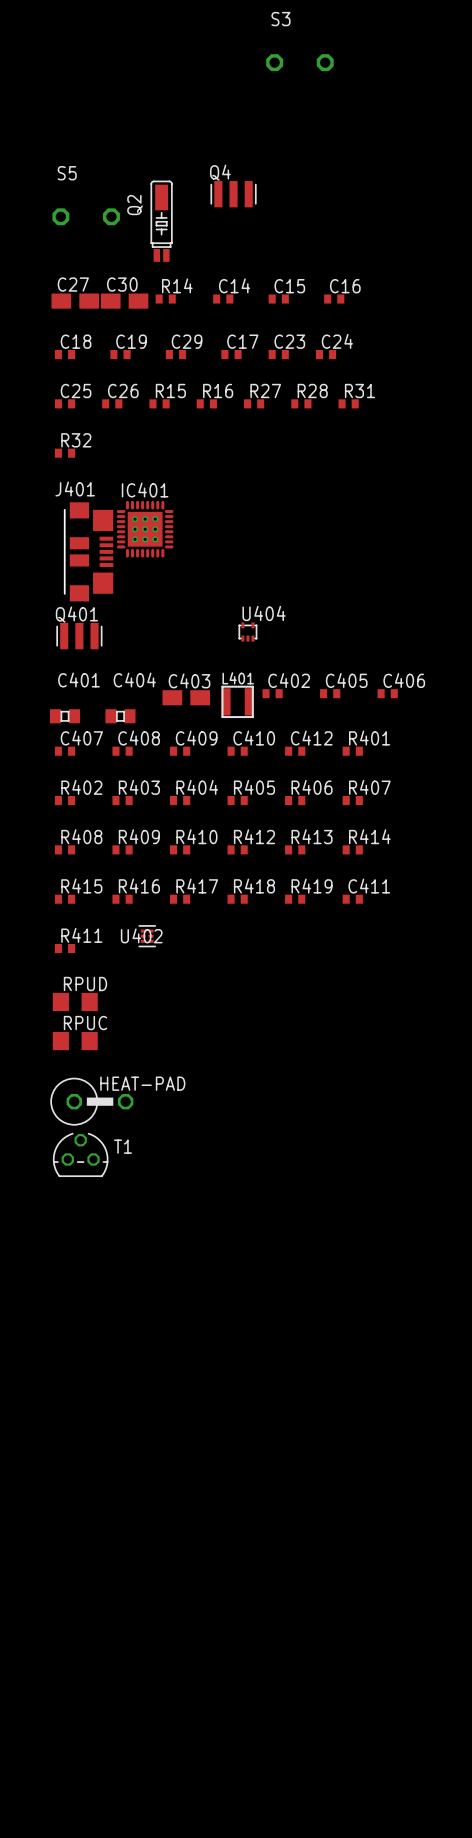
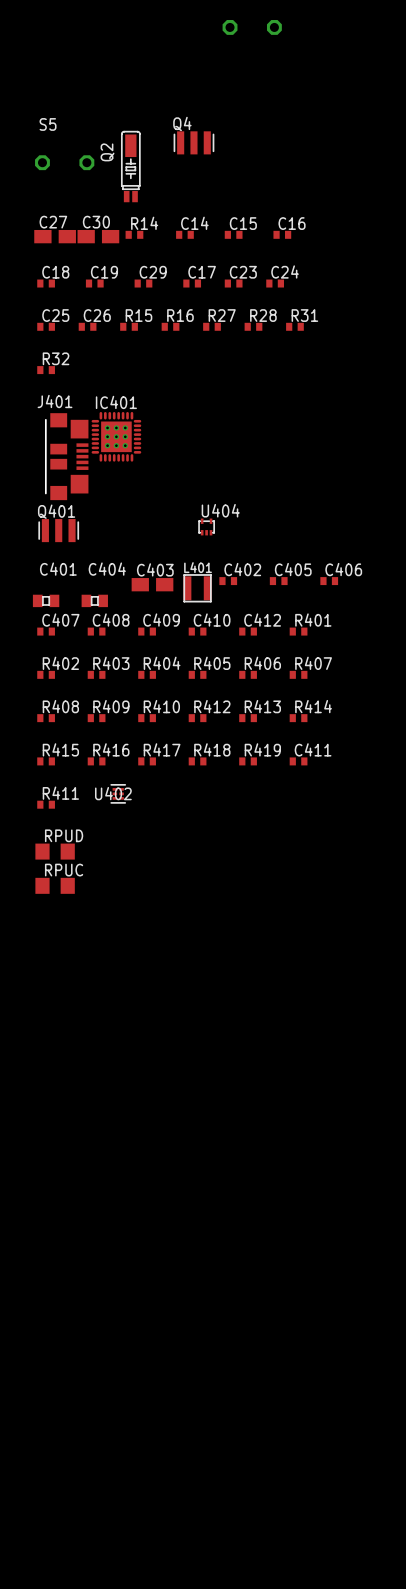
HEAT-PAD: (91, 1101) -> none
T1: (80, 1154) -> none

